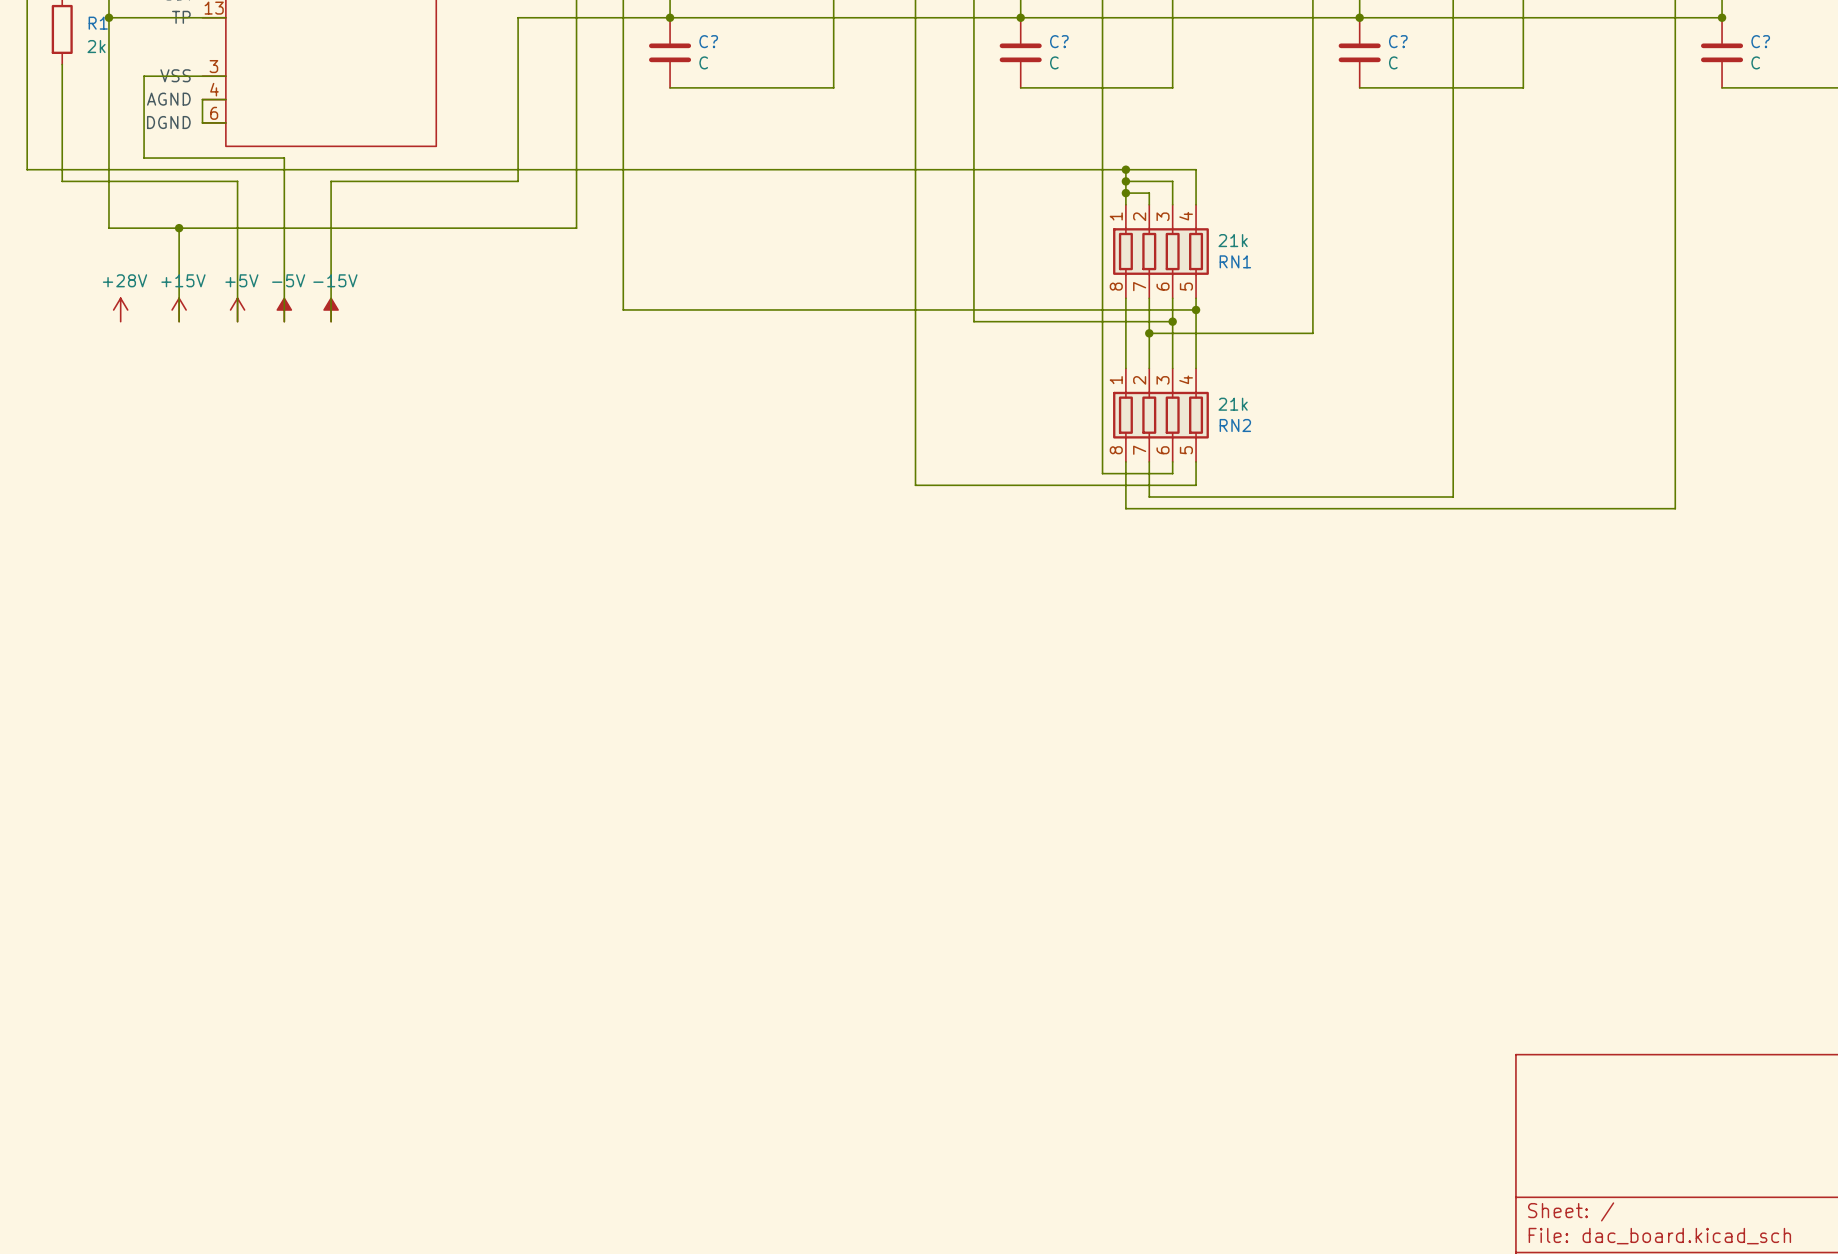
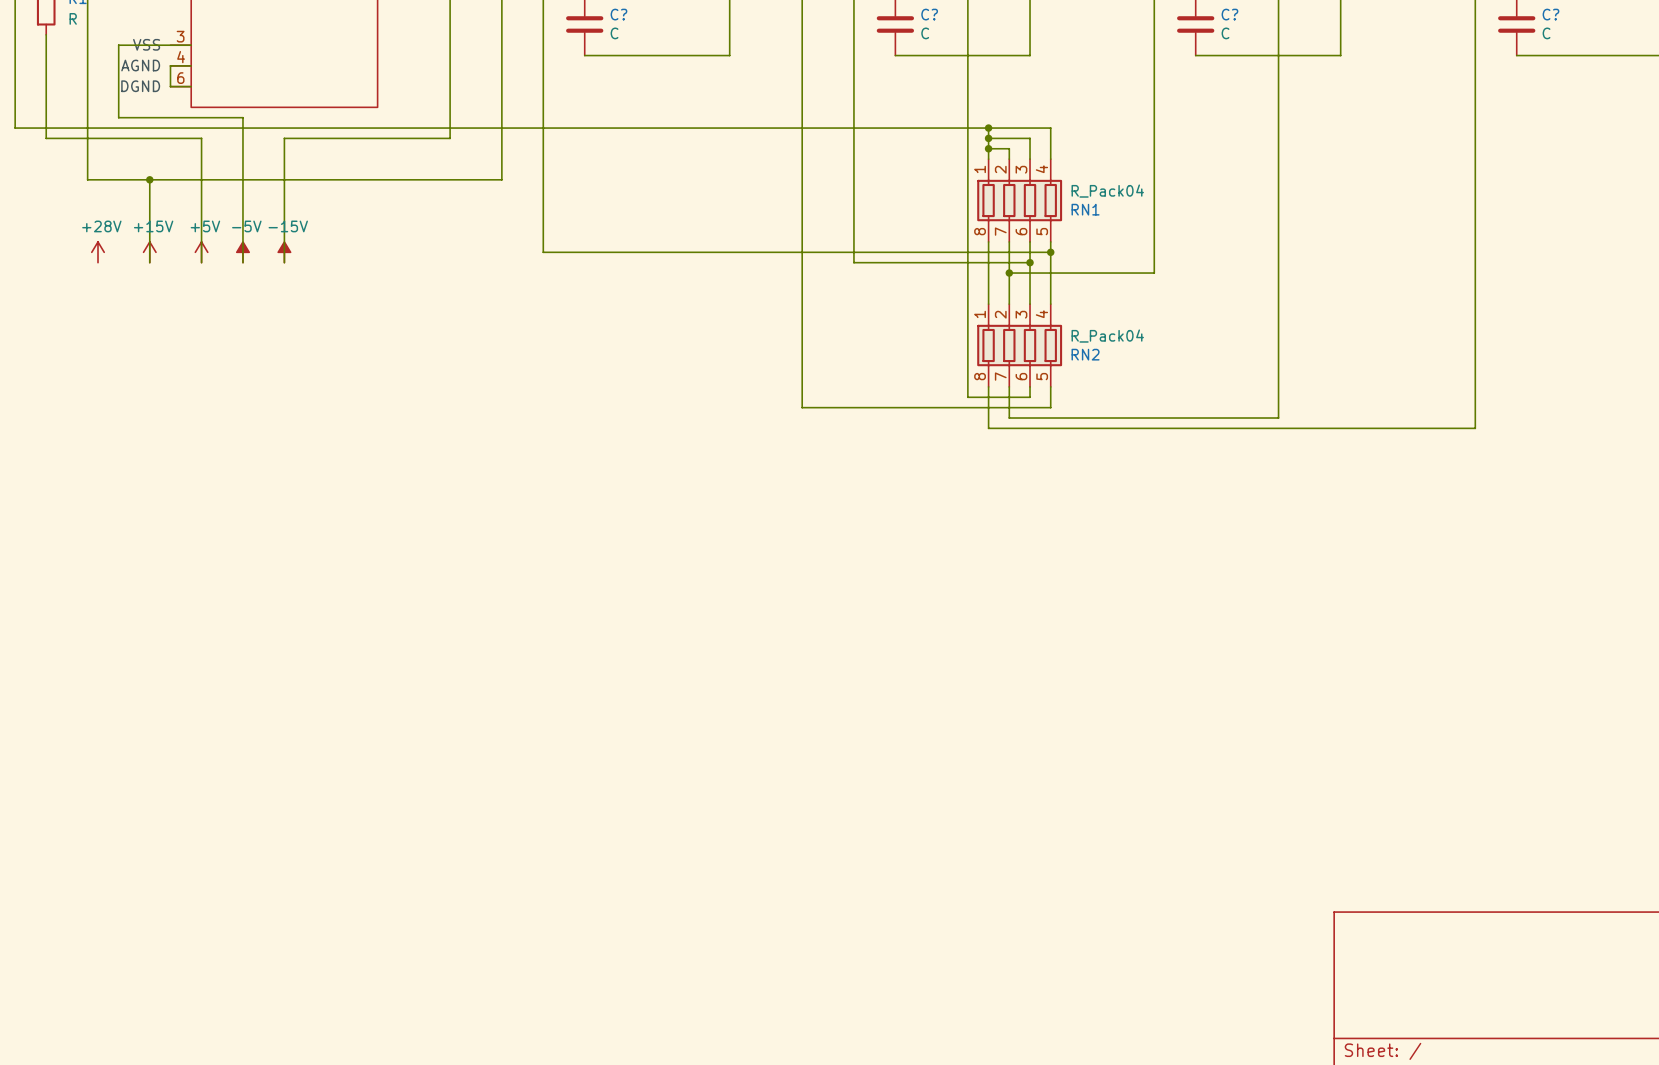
R1 value: 2k (96, 46) -> R (73, 18)
RN1 value: 21k (1233, 240) -> R_Pack04 (1107, 191)
RN2 value: 21k (1233, 404) -> R_Pack04 (1107, 336)

